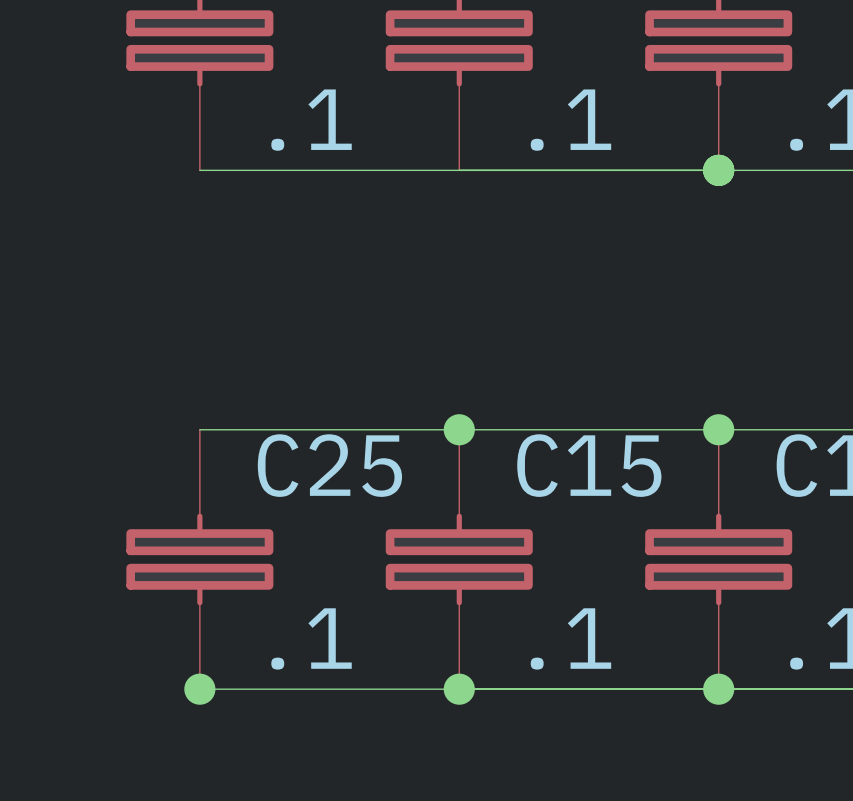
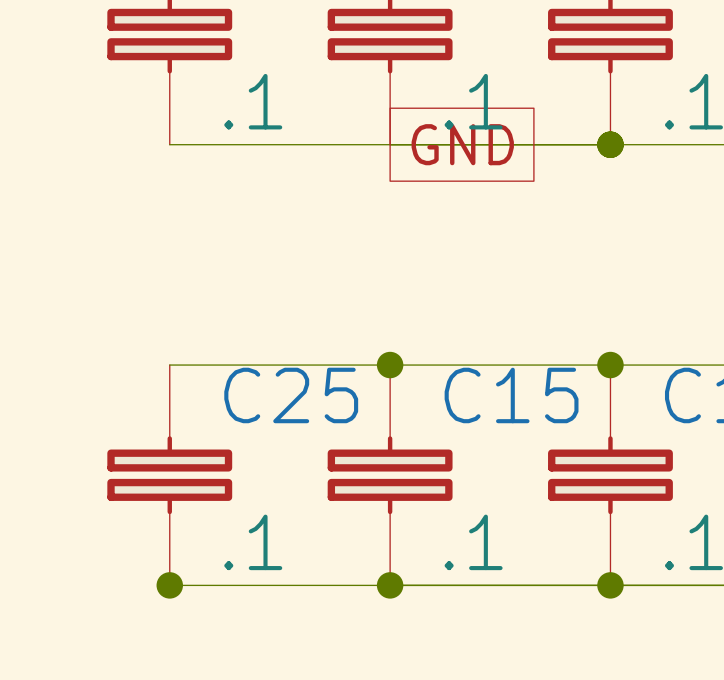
global label: none -> GND (462, 144)

